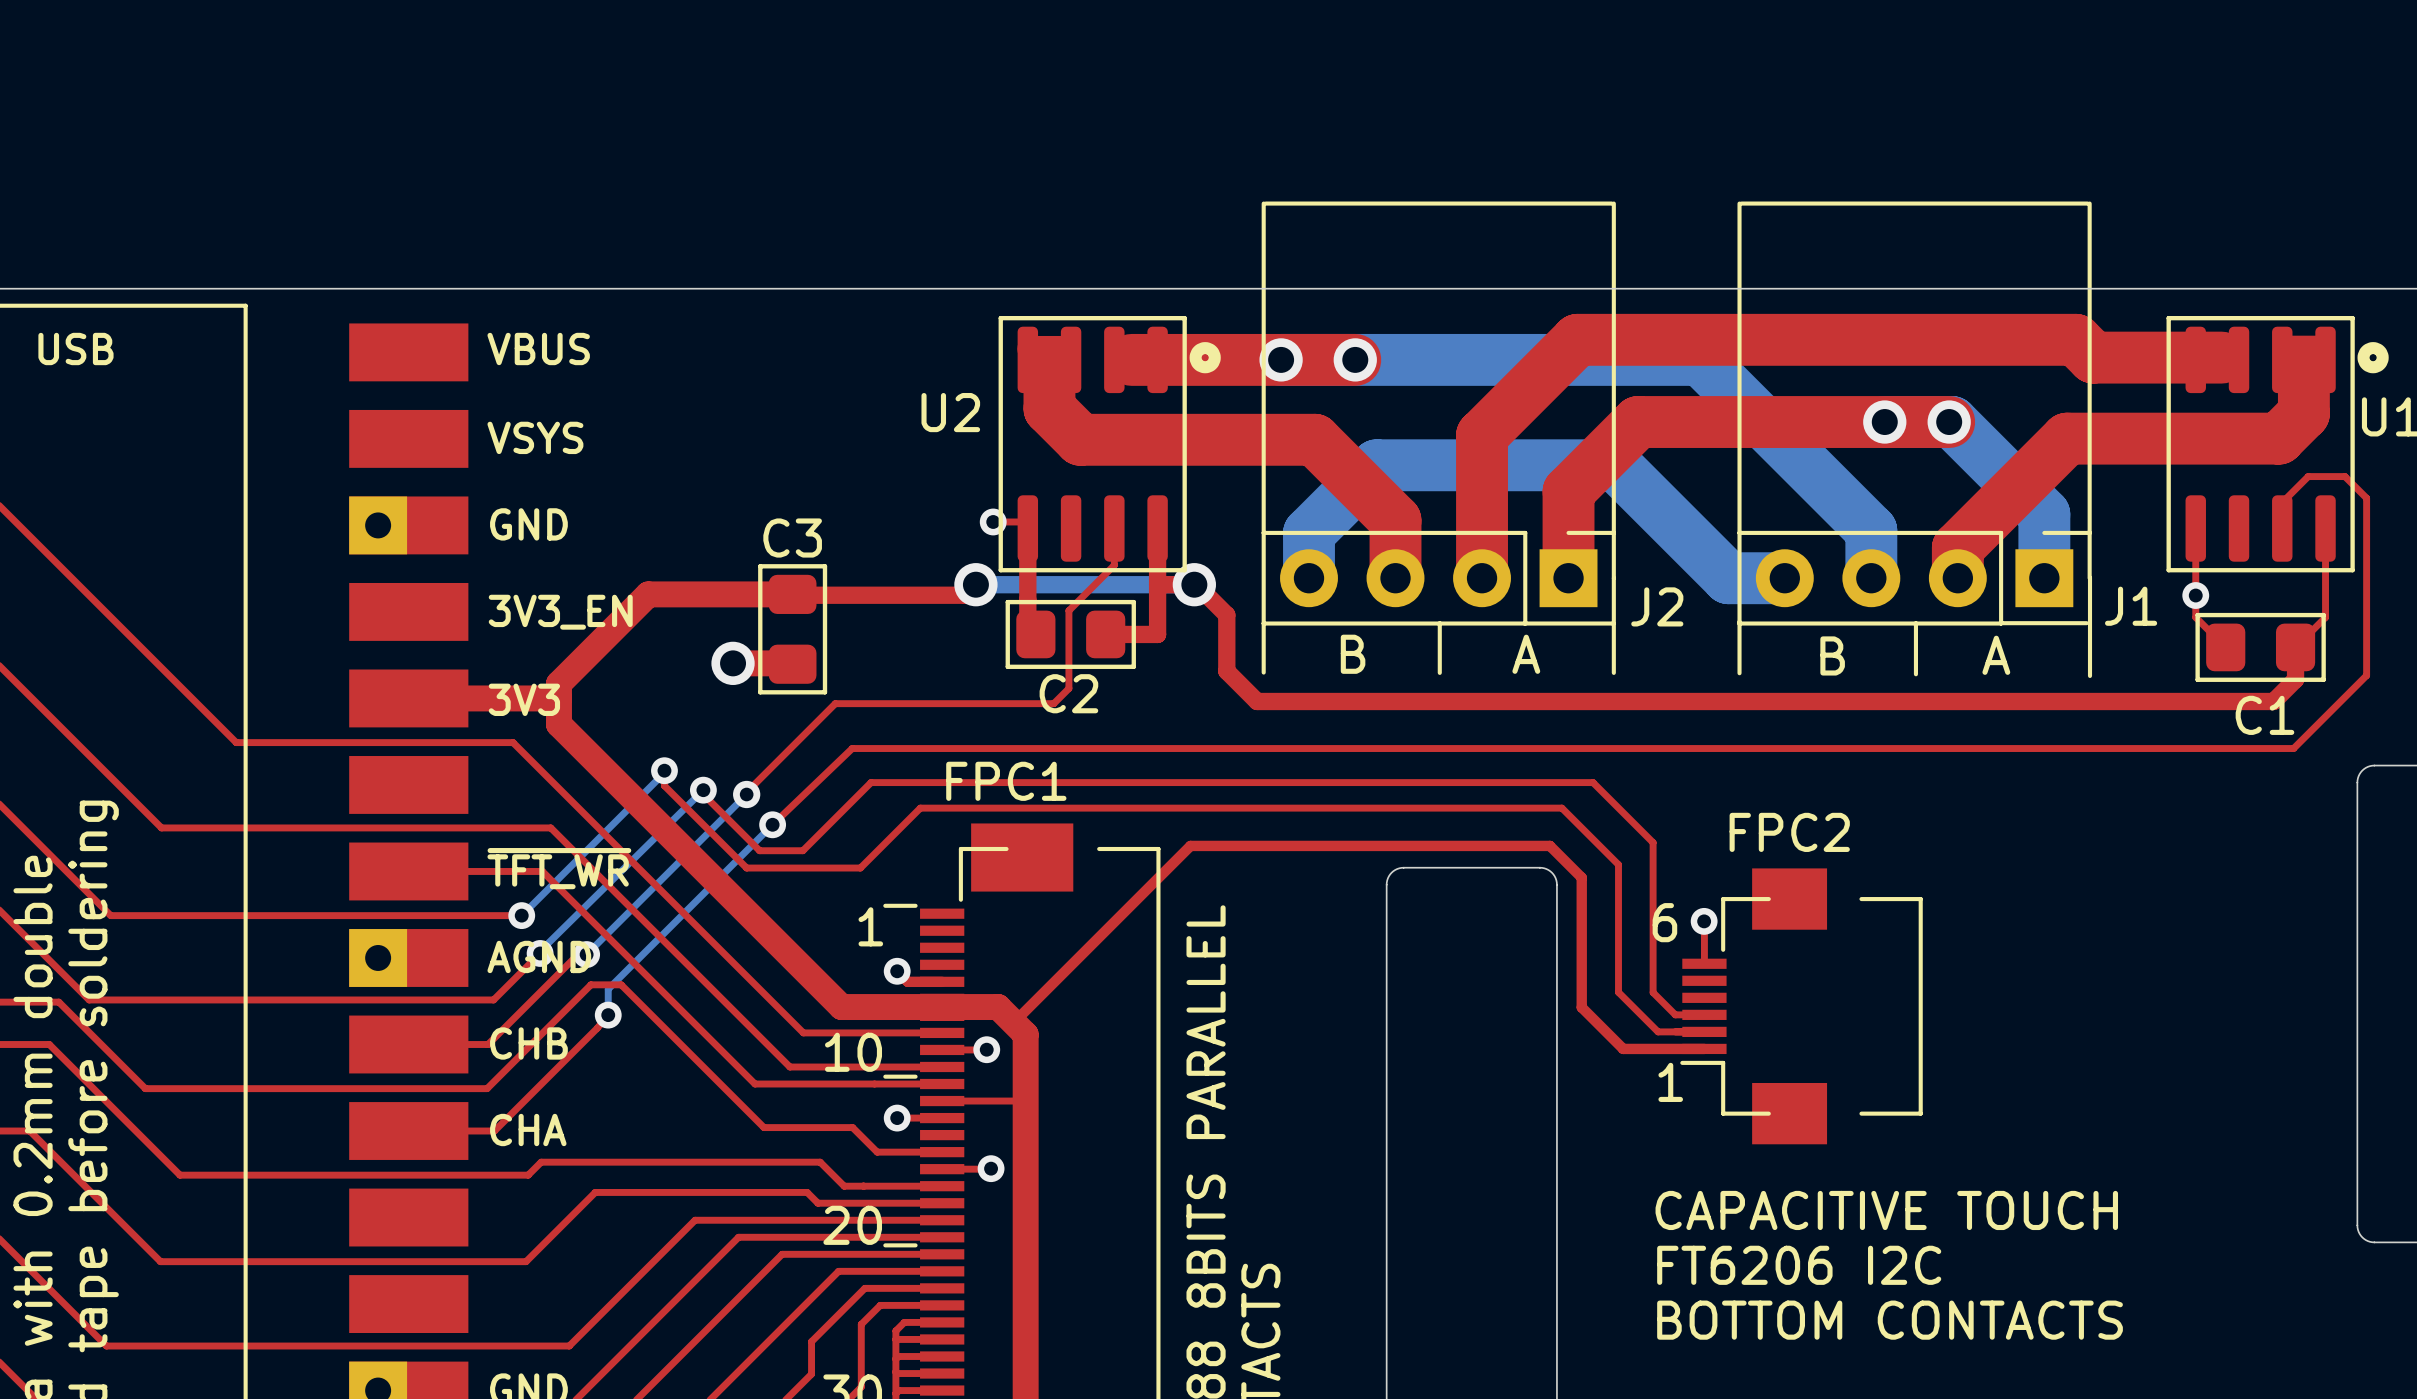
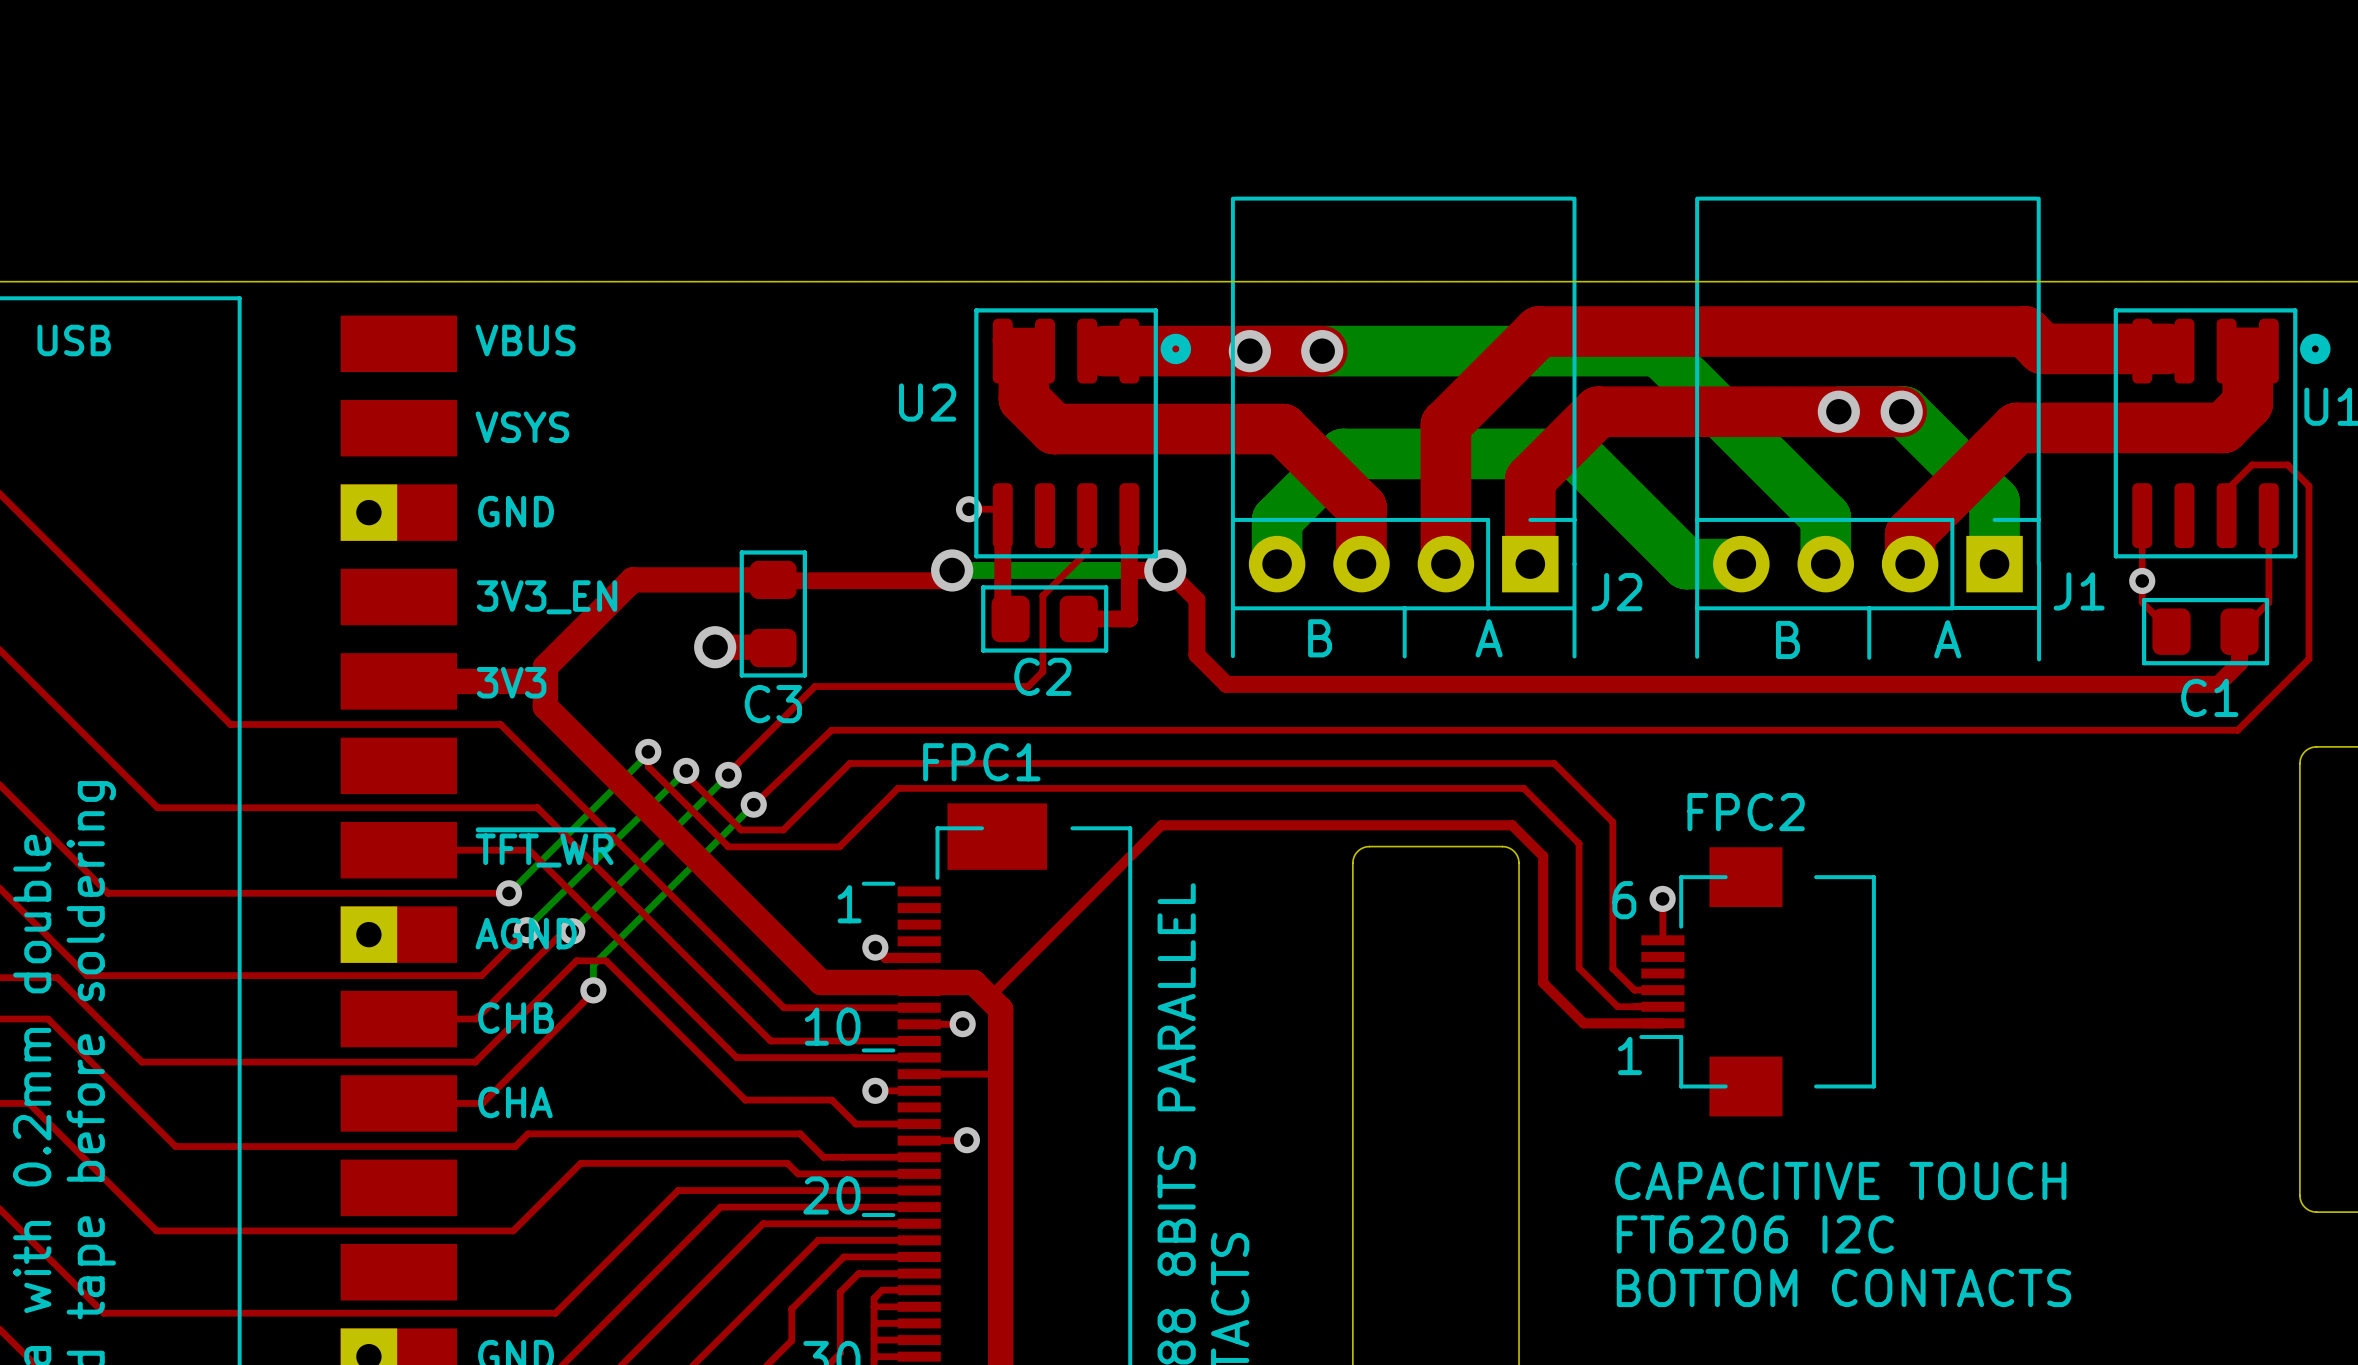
C3 name position: C3 (792, 538) -> C3 (773, 704)

